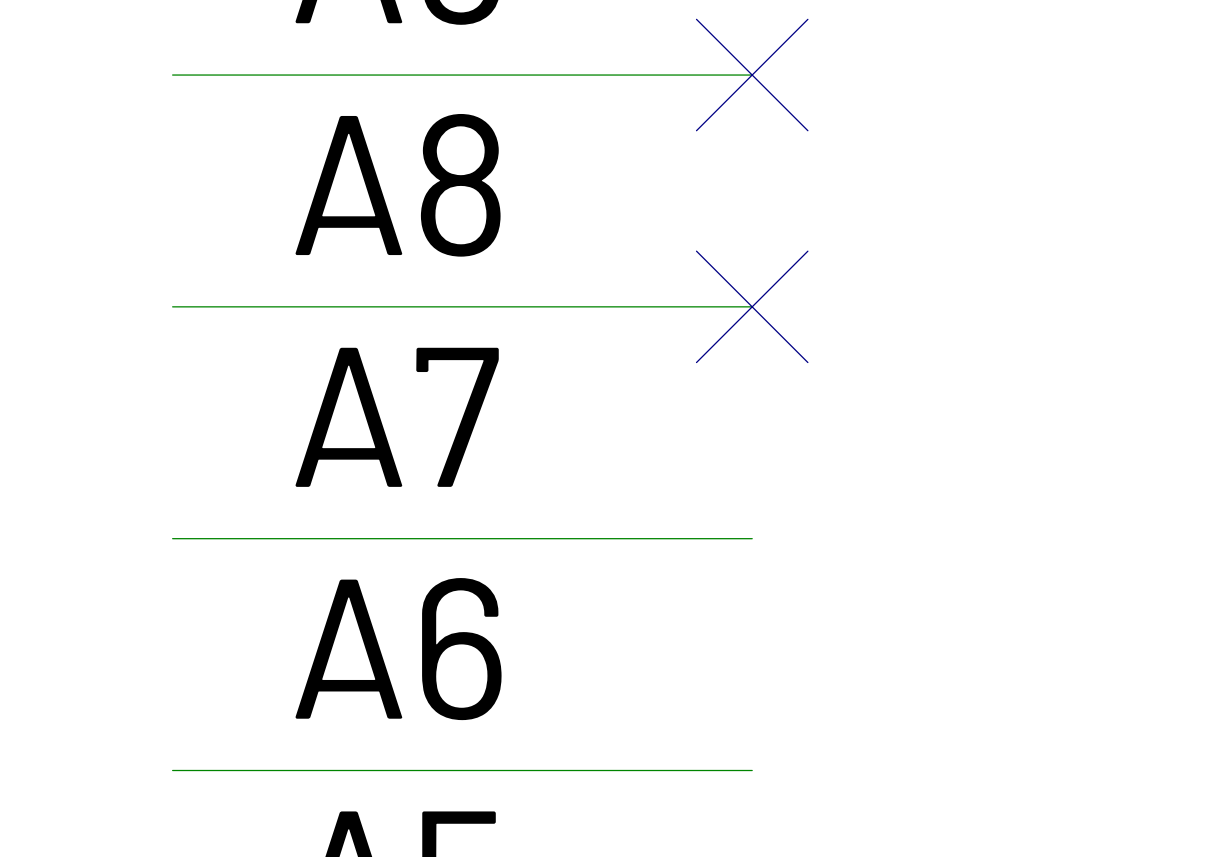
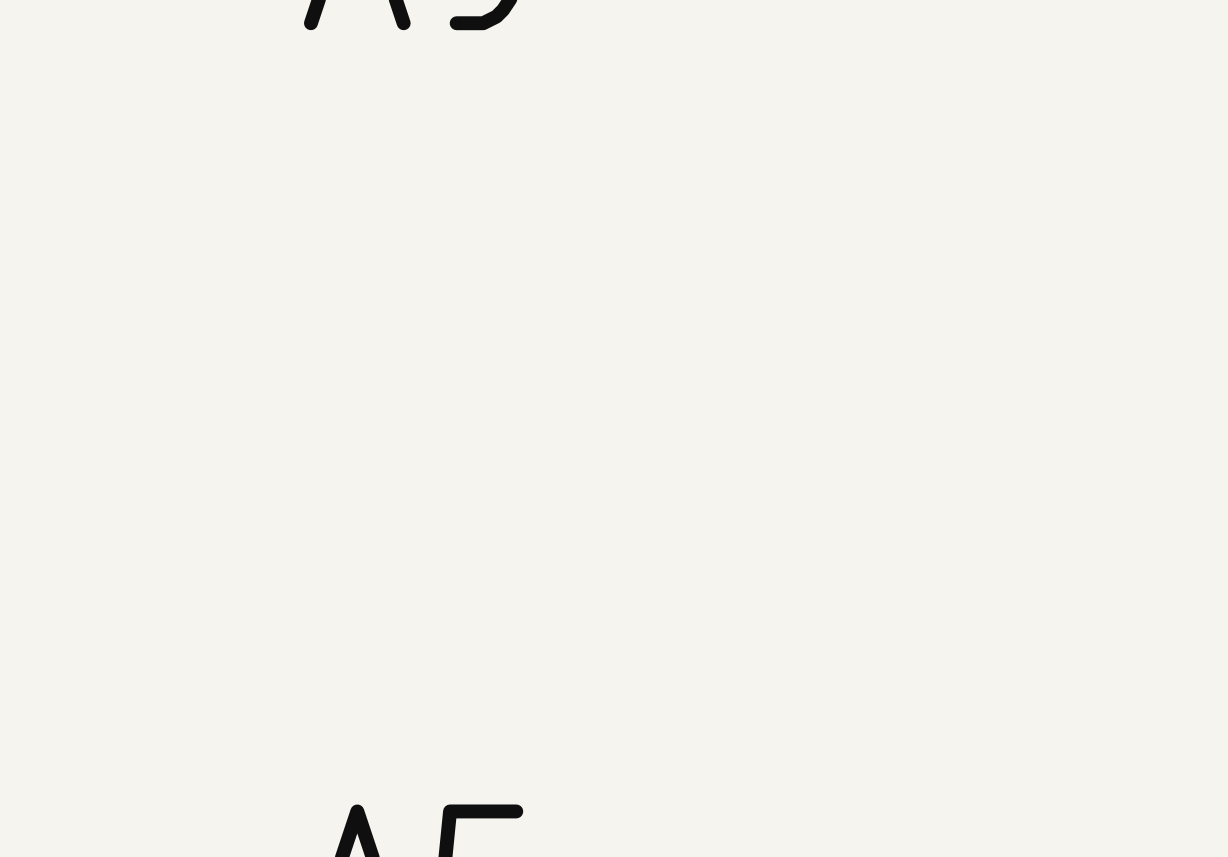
wire: (172, 75) (752, 75) -> none
no-connect mark: (752, 75) -> none
label: A8 (397, 185) -> none
wire: (172, 306) (752, 306) -> none
no-connect mark: (752, 306) -> none
label: A7 (396, 417) -> none
wire: (172, 538) (752, 538) -> none
label: A6 (398, 649) -> none
wire: (172, 770) (752, 770) -> none

